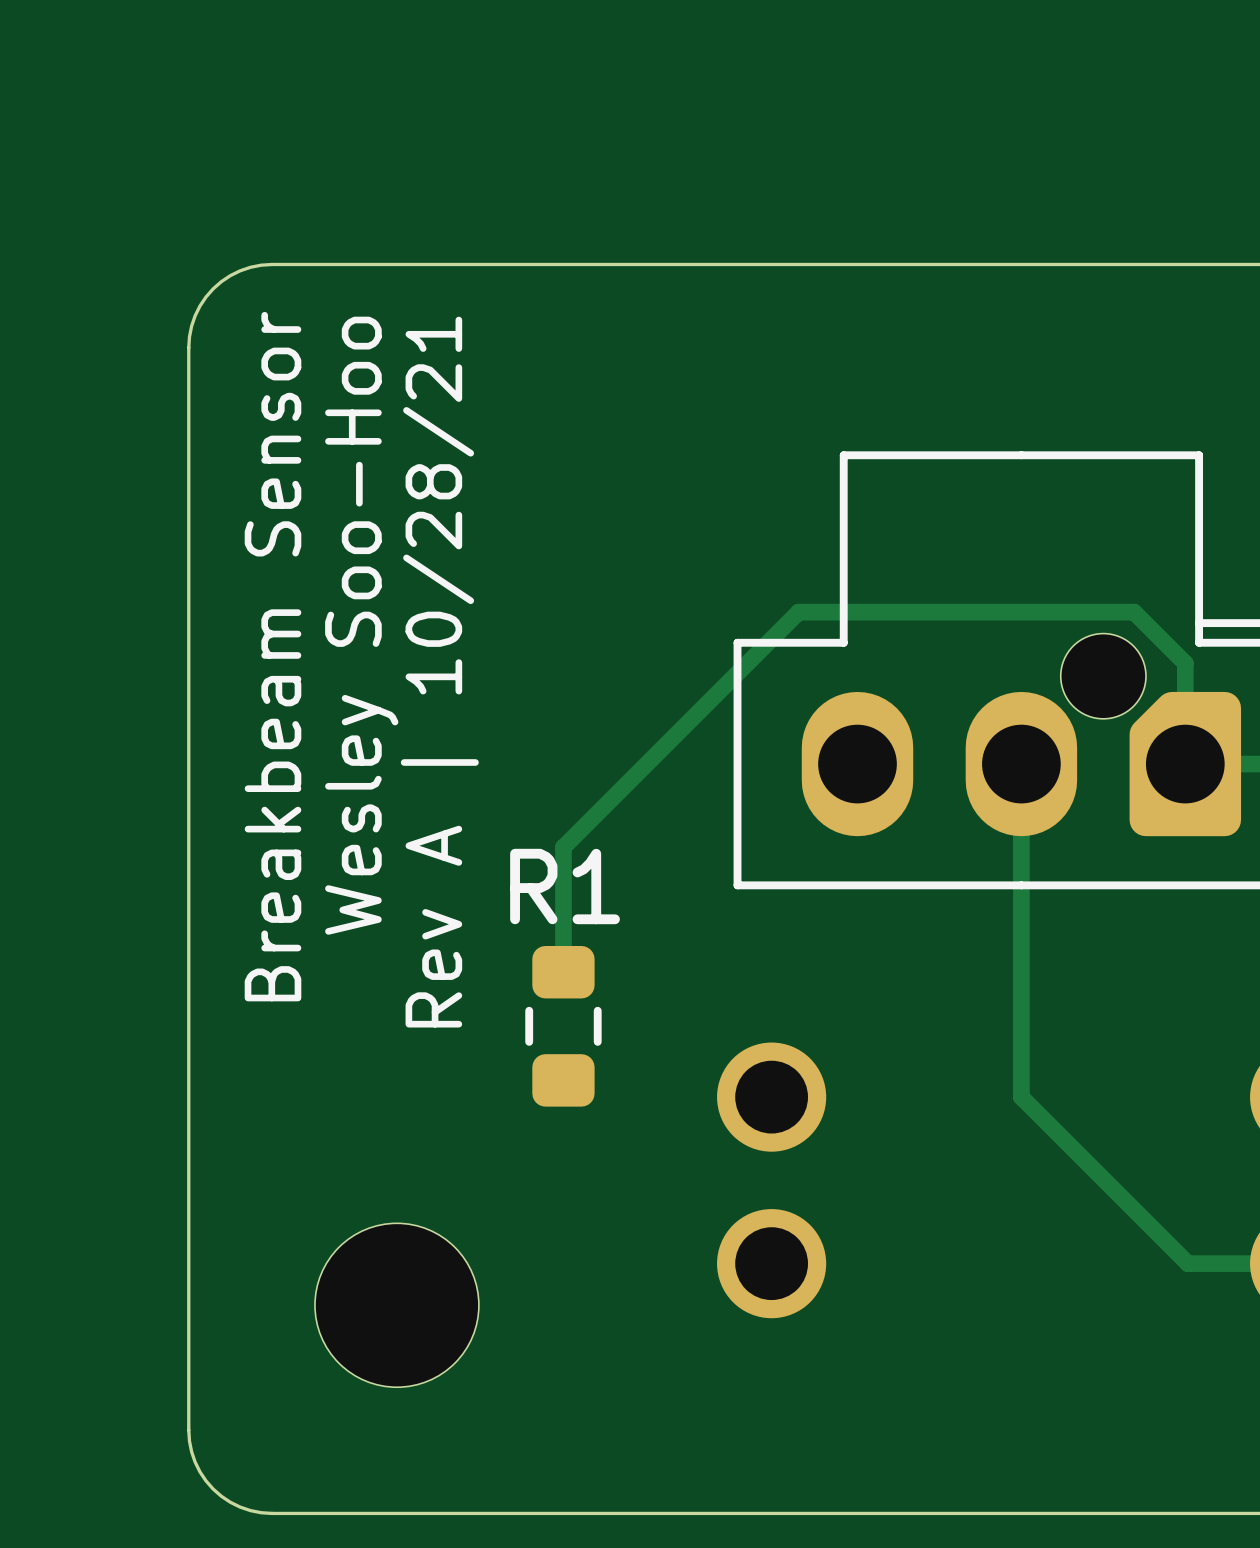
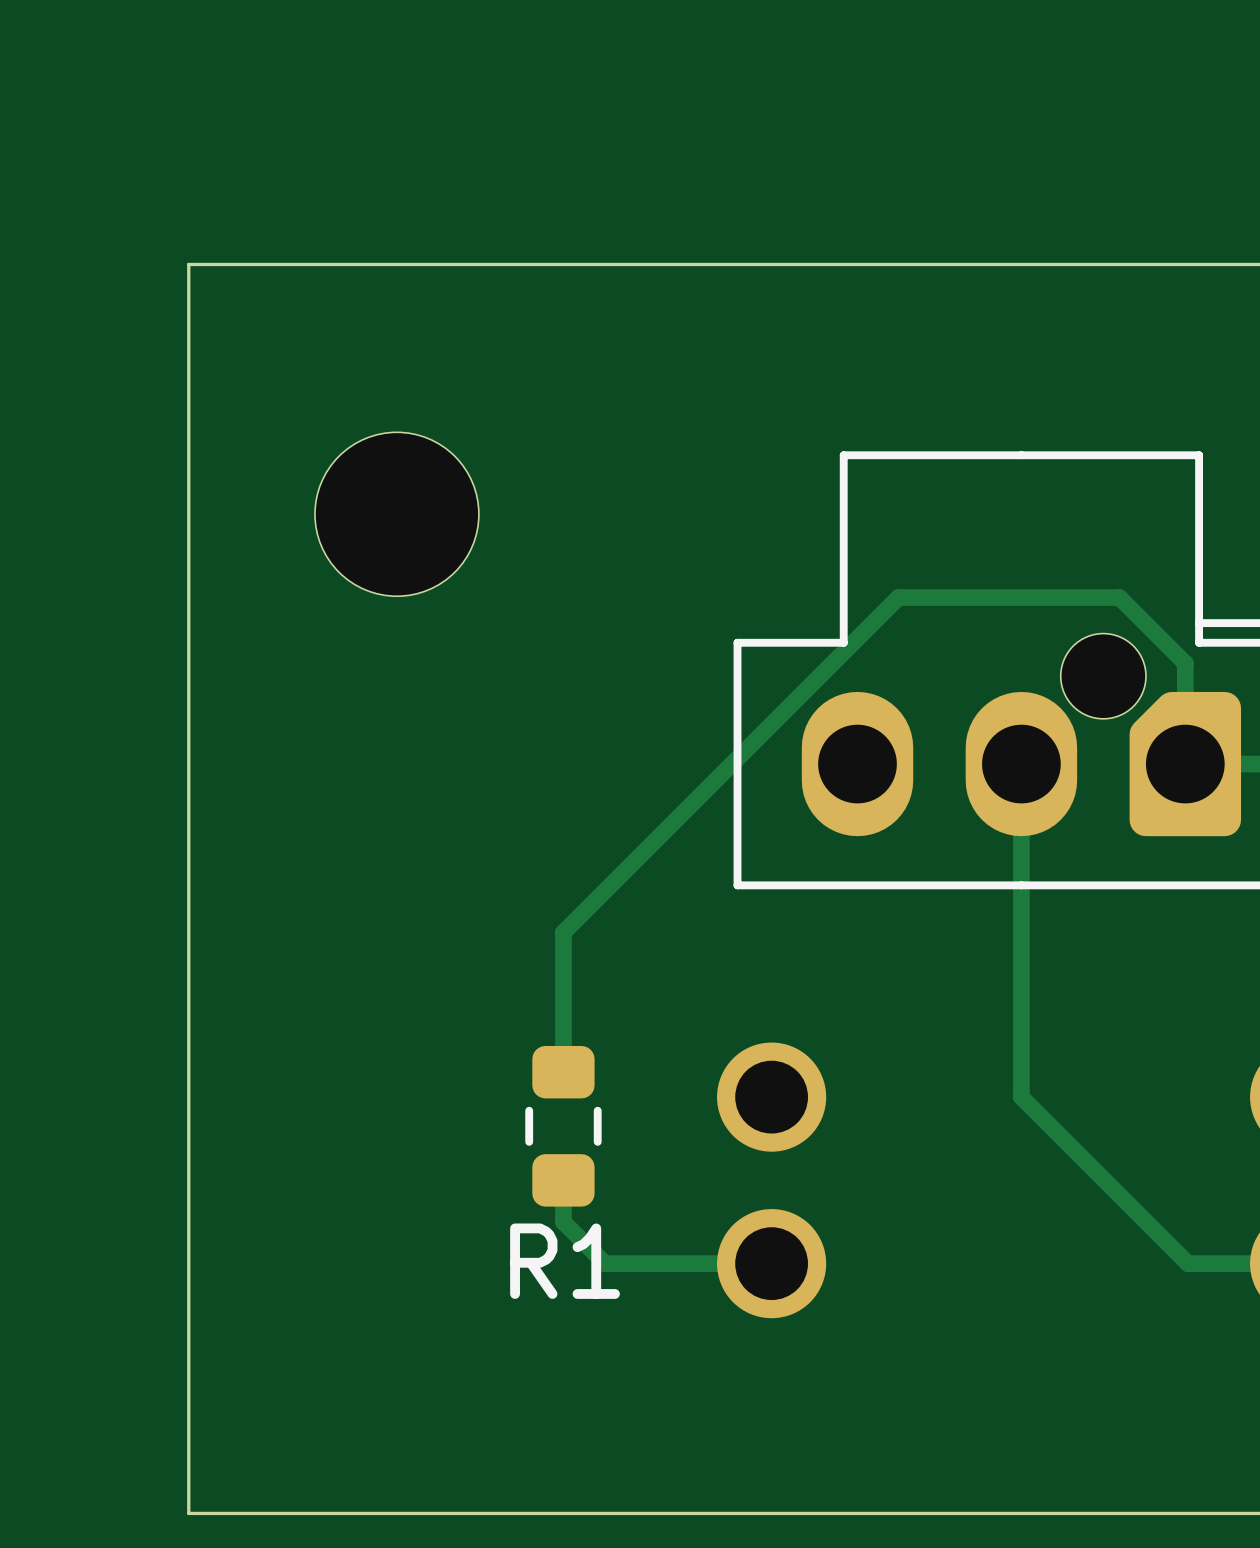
board edge: (272, 264) (240, 270) (213, 288) (195, 315) (188, 347) -> (272, 264) (188, 264) (188, 347)
track: (1134, 612) (798, 612) (563, 847) (563, 932) -> (1134, 612) (1119, 597) (898, 597) (563, 932)
text: Wesley Soo-Hoo (361, 625) -> none
text: Breakbeam Sensor (273, 656) -> none
text: Rev A | 10/28/21 (439, 672) -> none
R1 name position: R1 (565, 886) -> R1 (565, 1261)
track: none -> (563, 972) (563, 1072)
R1 position: (563, 1026) -> (563, 1126)
track: none -> (563, 1180) (563, 1222) (605, 1263) (771, 1263)
part position: (396, 1305) -> (396, 514)
board edge: (188, 1430) (195, 1462) (213, 1489) (240, 1507) (272, 1513) -> (188, 1430) (188, 1513) (272, 1513)

